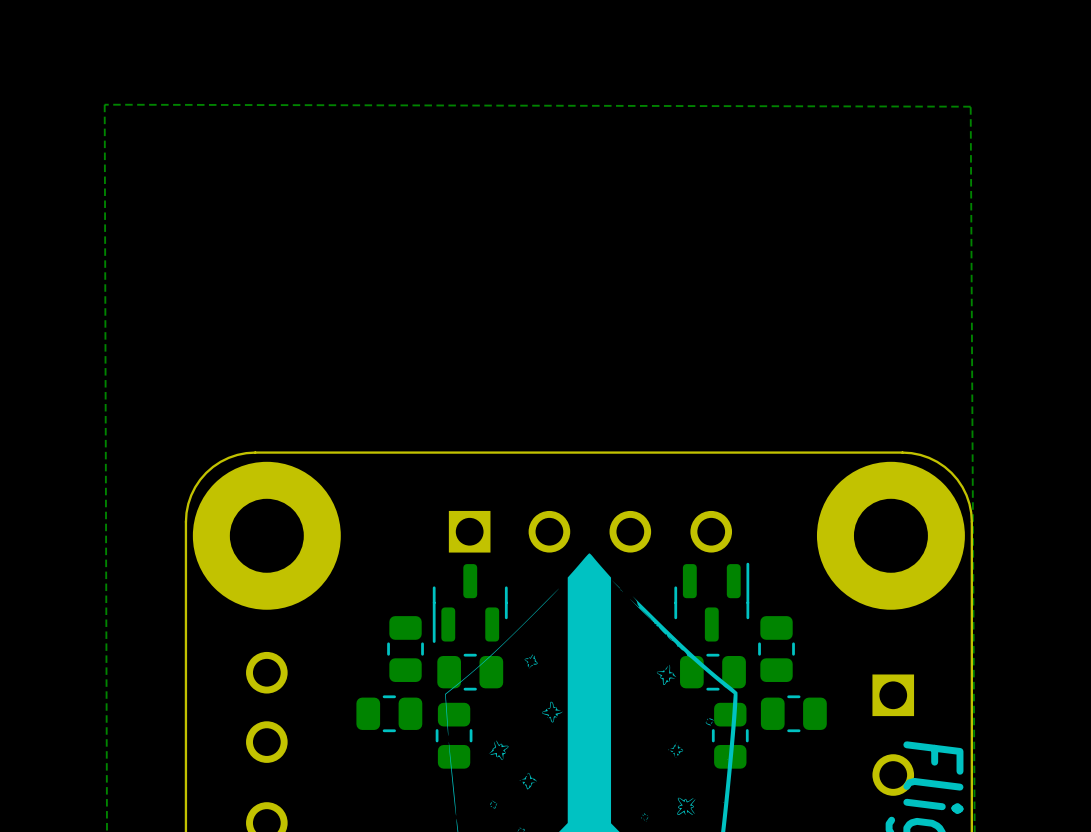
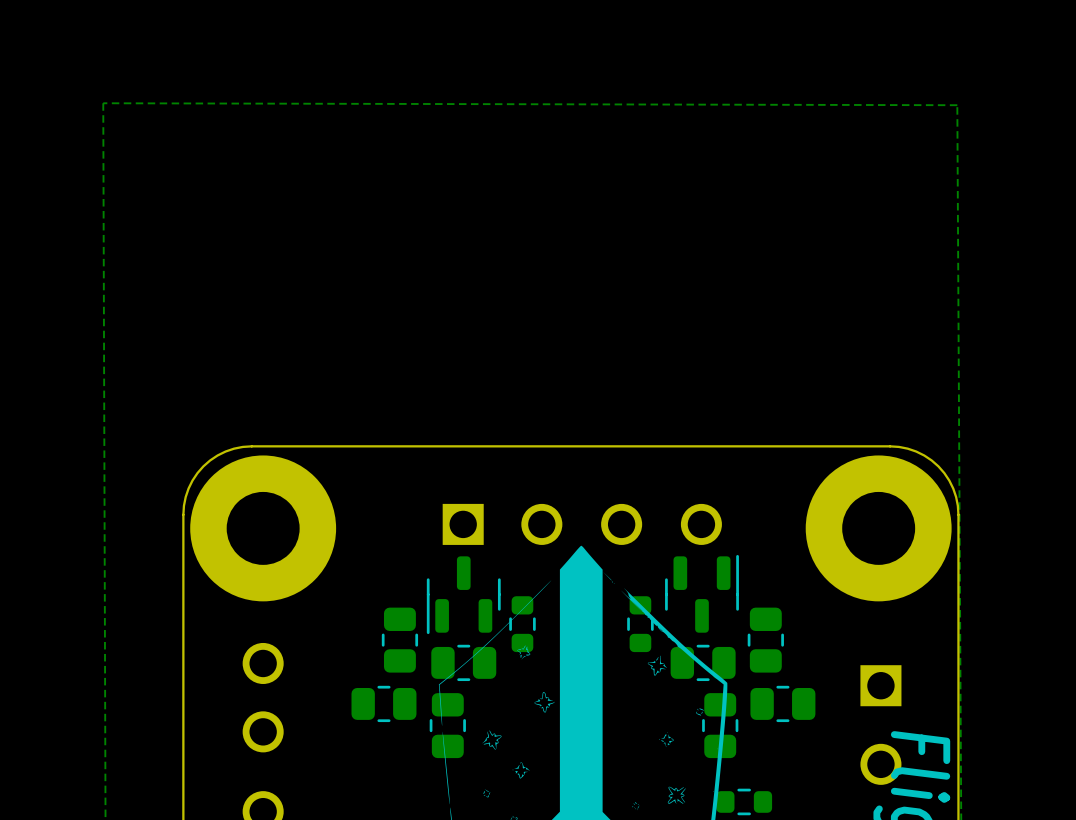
part: none -> (522, 624)
part: none -> (640, 624)
part: none -> (744, 801)

